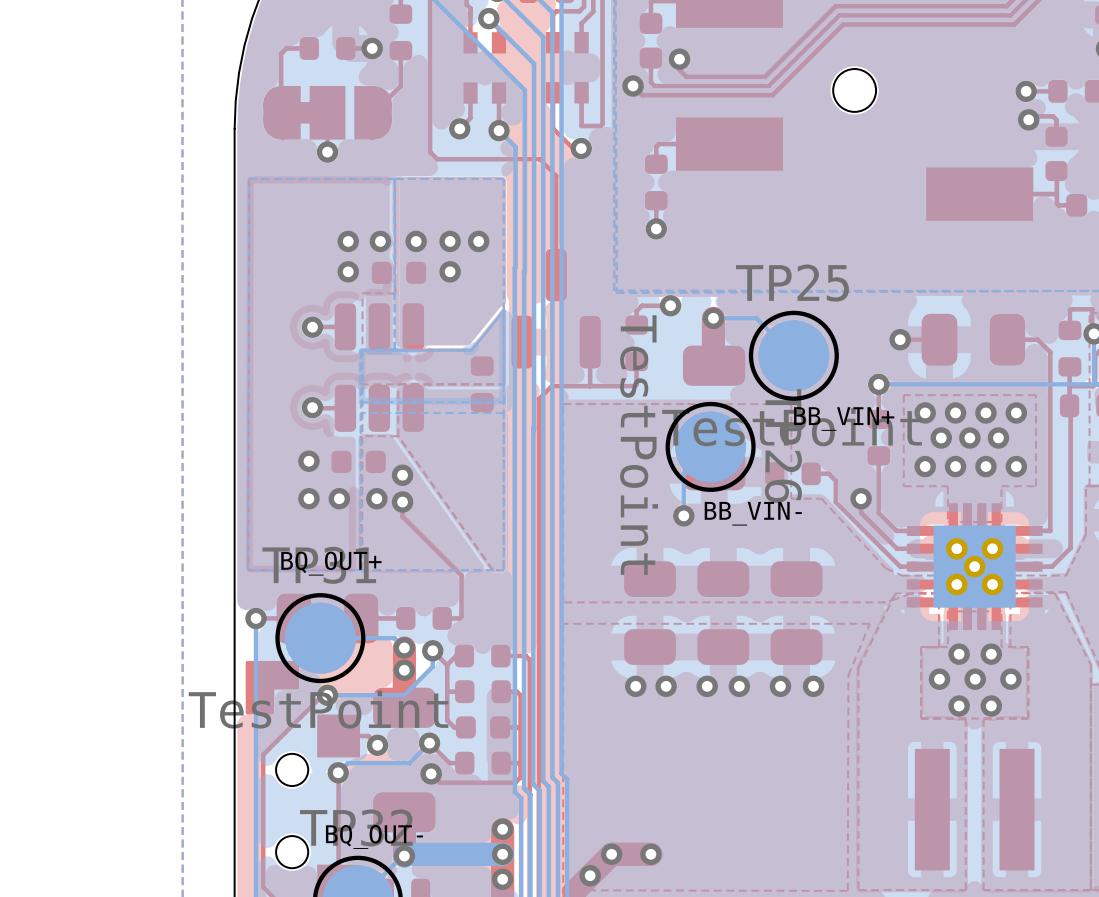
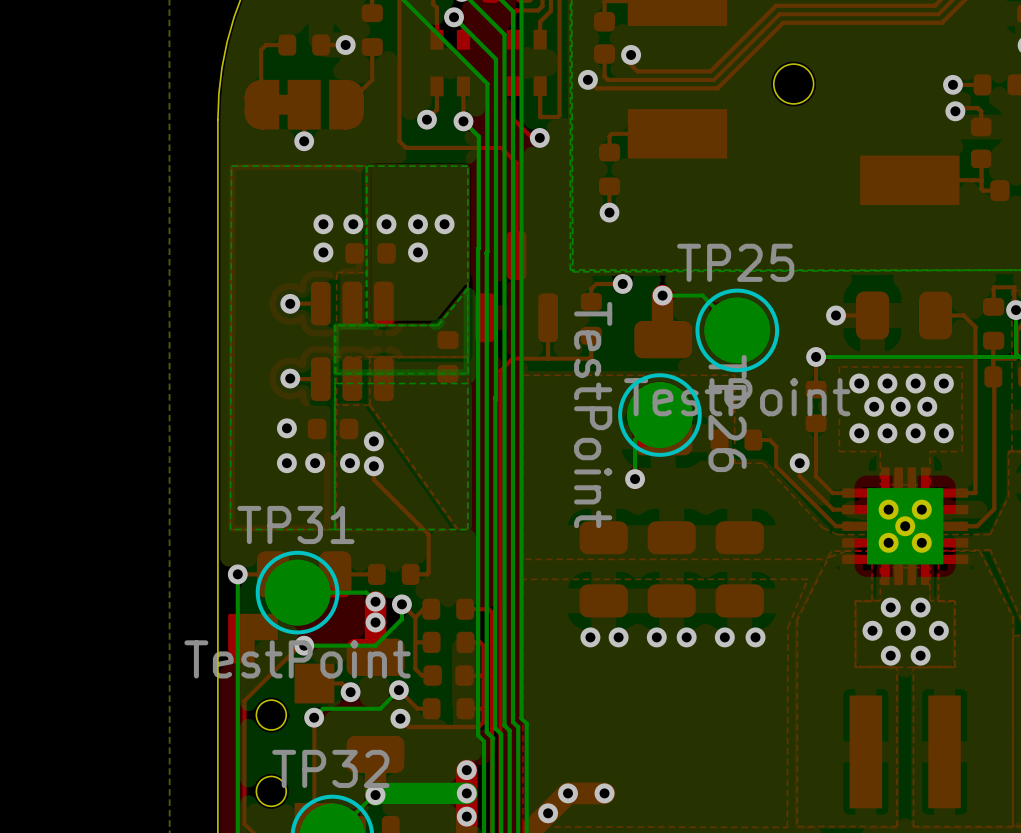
text: BB_VIN+ (844, 419) -> none
text: BB_VIN- (753, 513) -> none
text: BQ_OUT+ (331, 563) -> none
text: BQ_OUT- (374, 836) -> none

